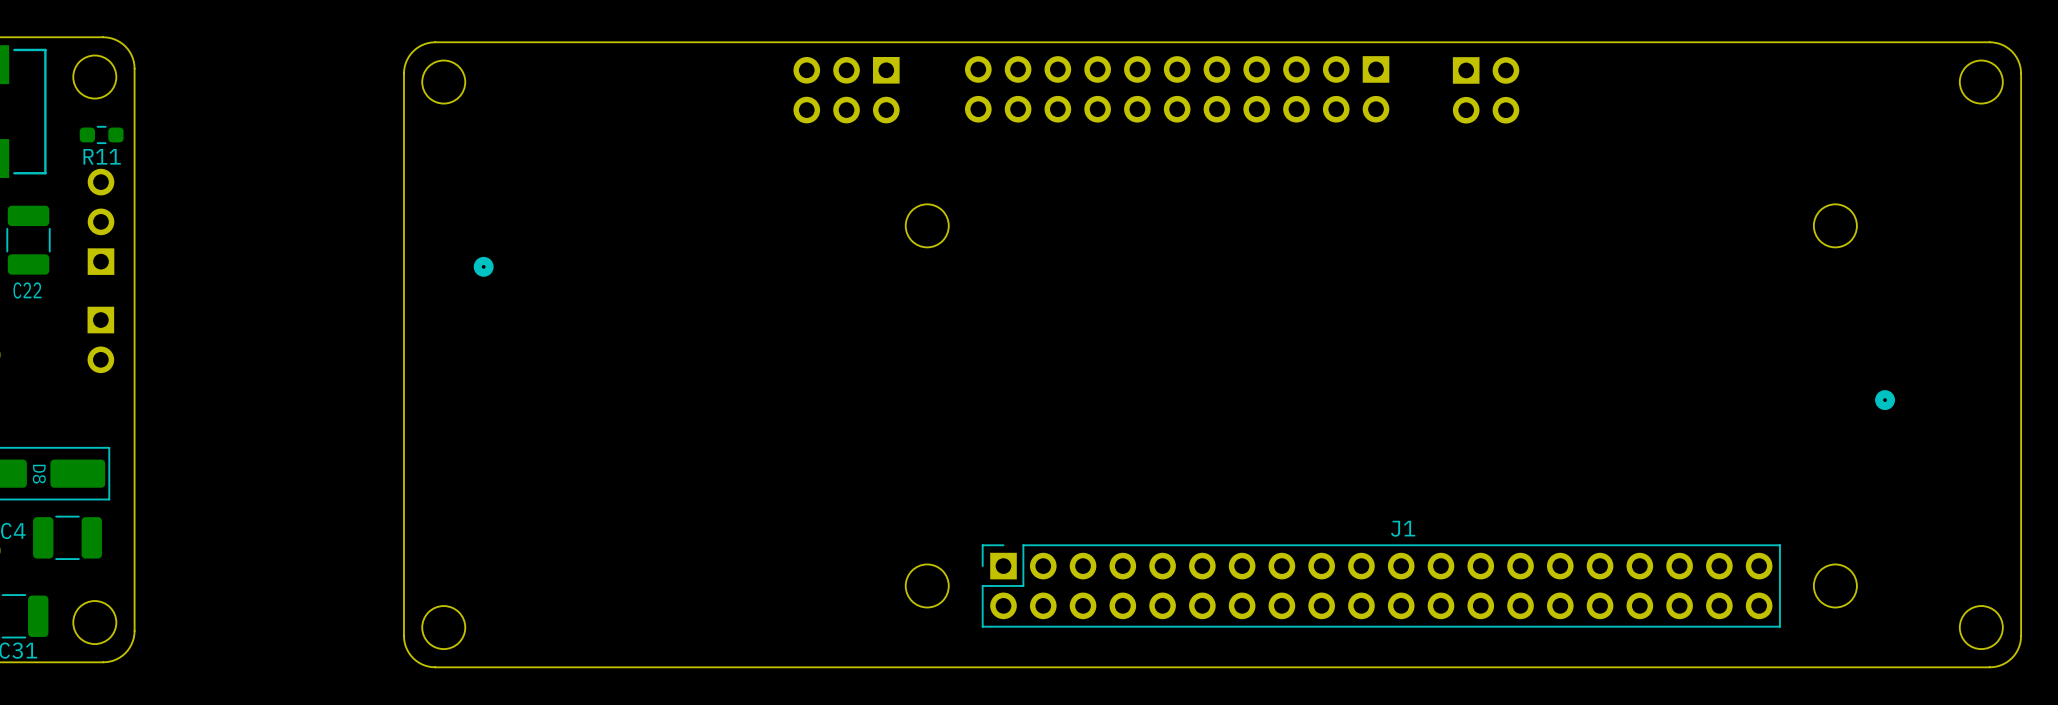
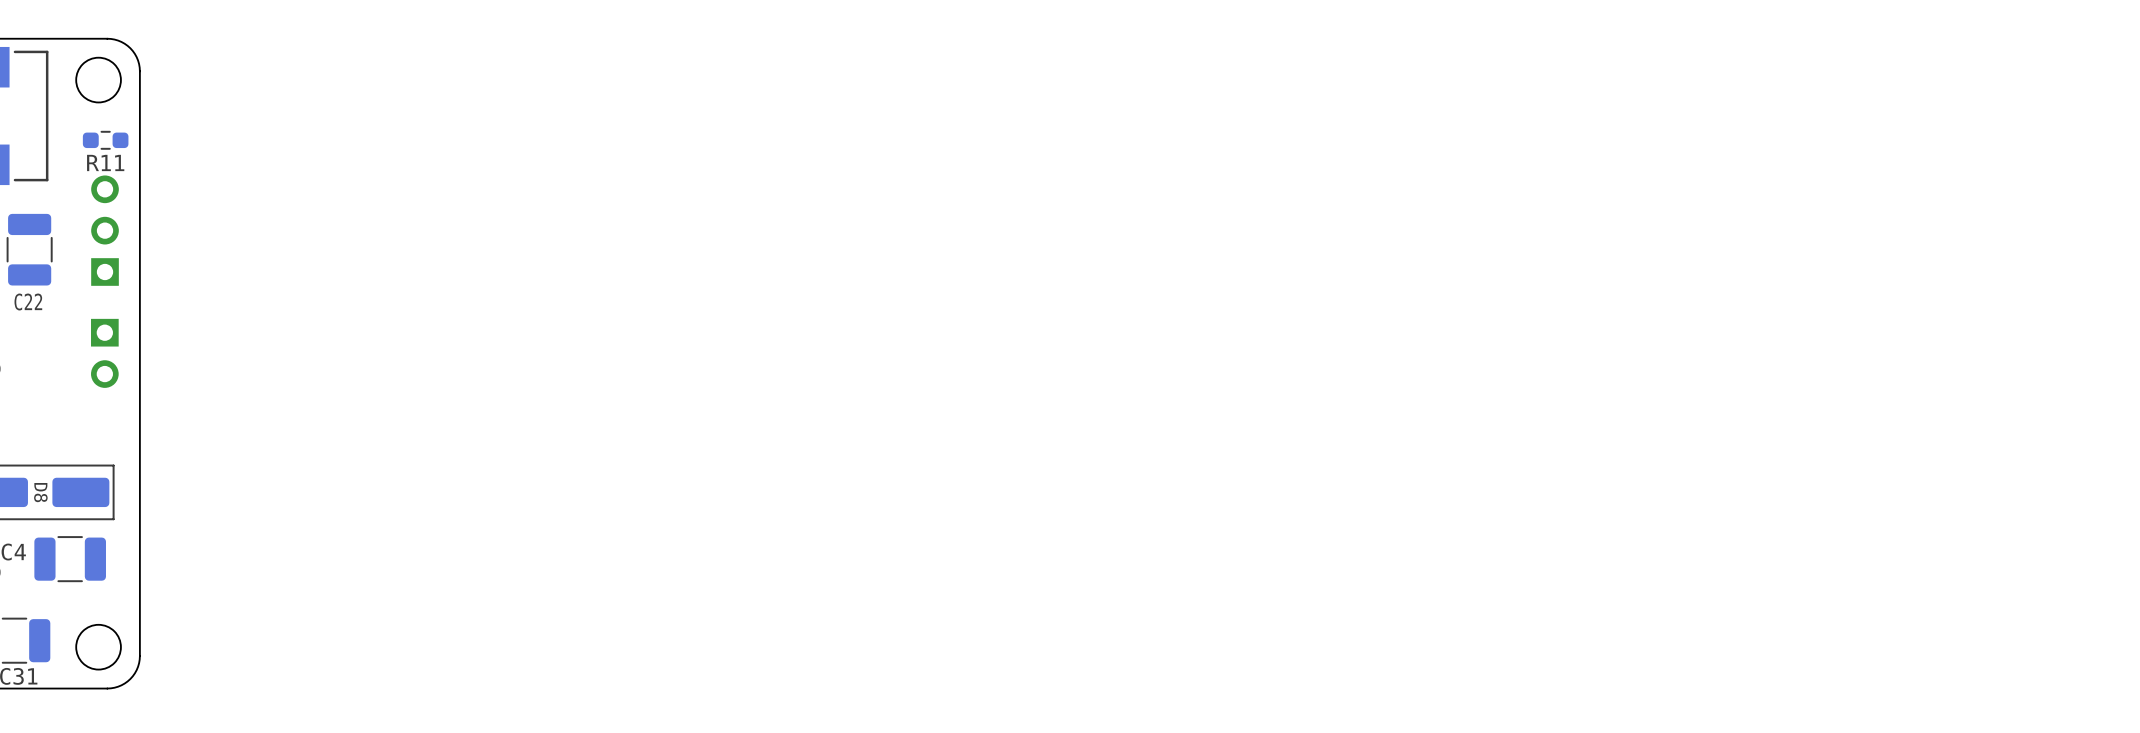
part: (846, 90) -> none
part: (1486, 90) -> none
part: (483, 266) -> none
part: (1212, 354) -> none
part: (1885, 400) -> none
J1: (1381, 415) -> none

